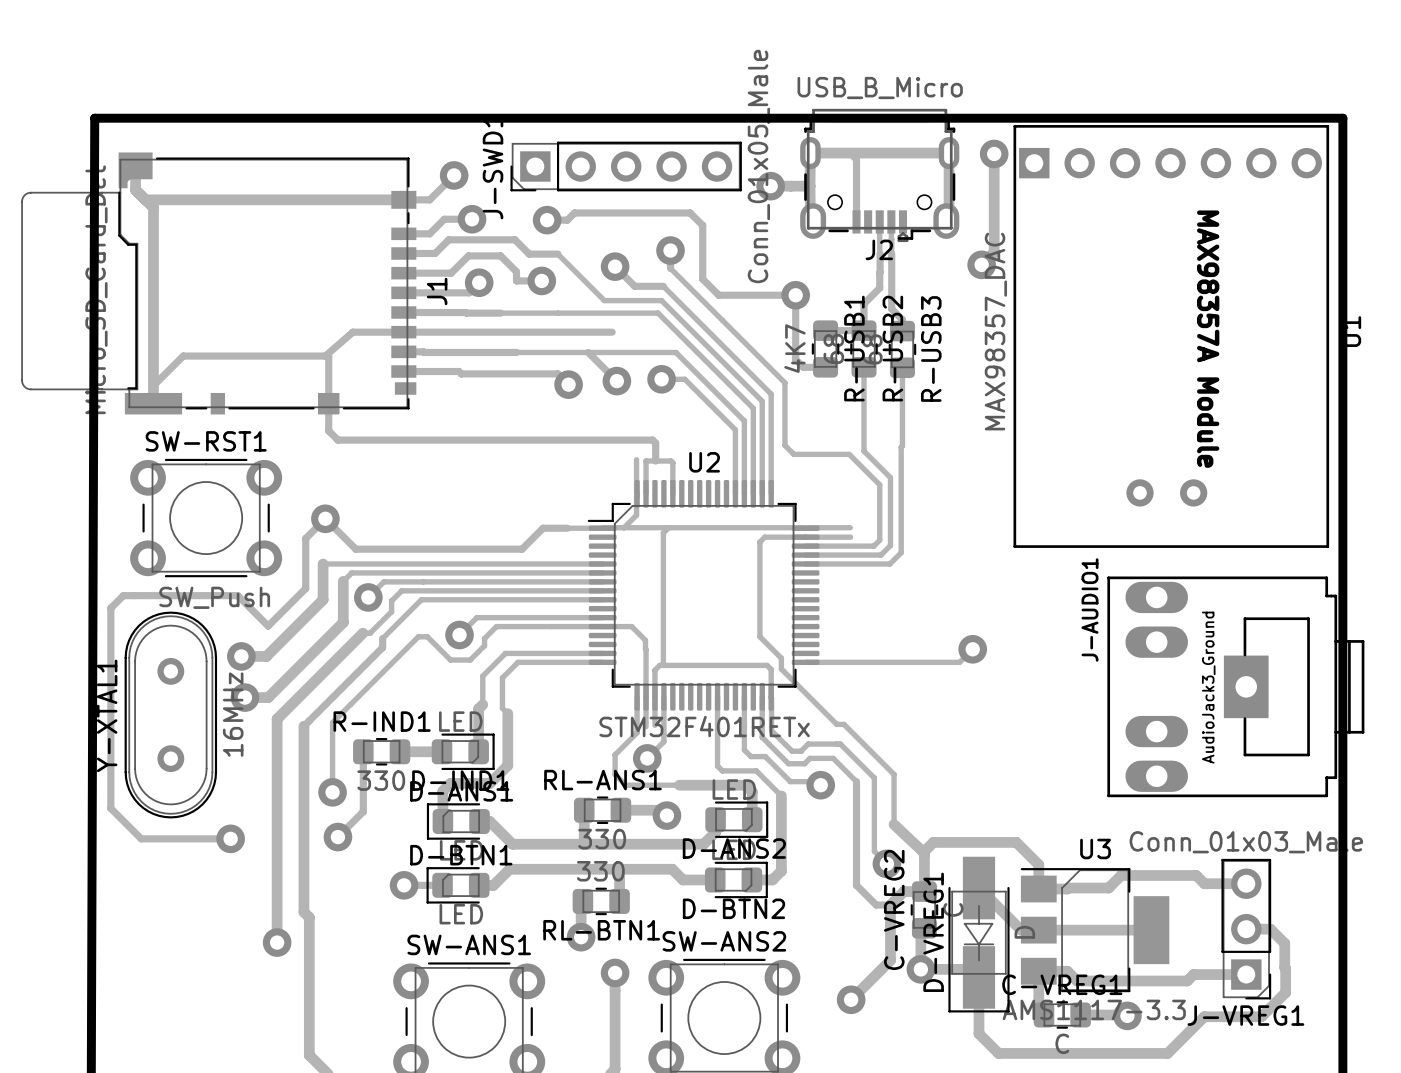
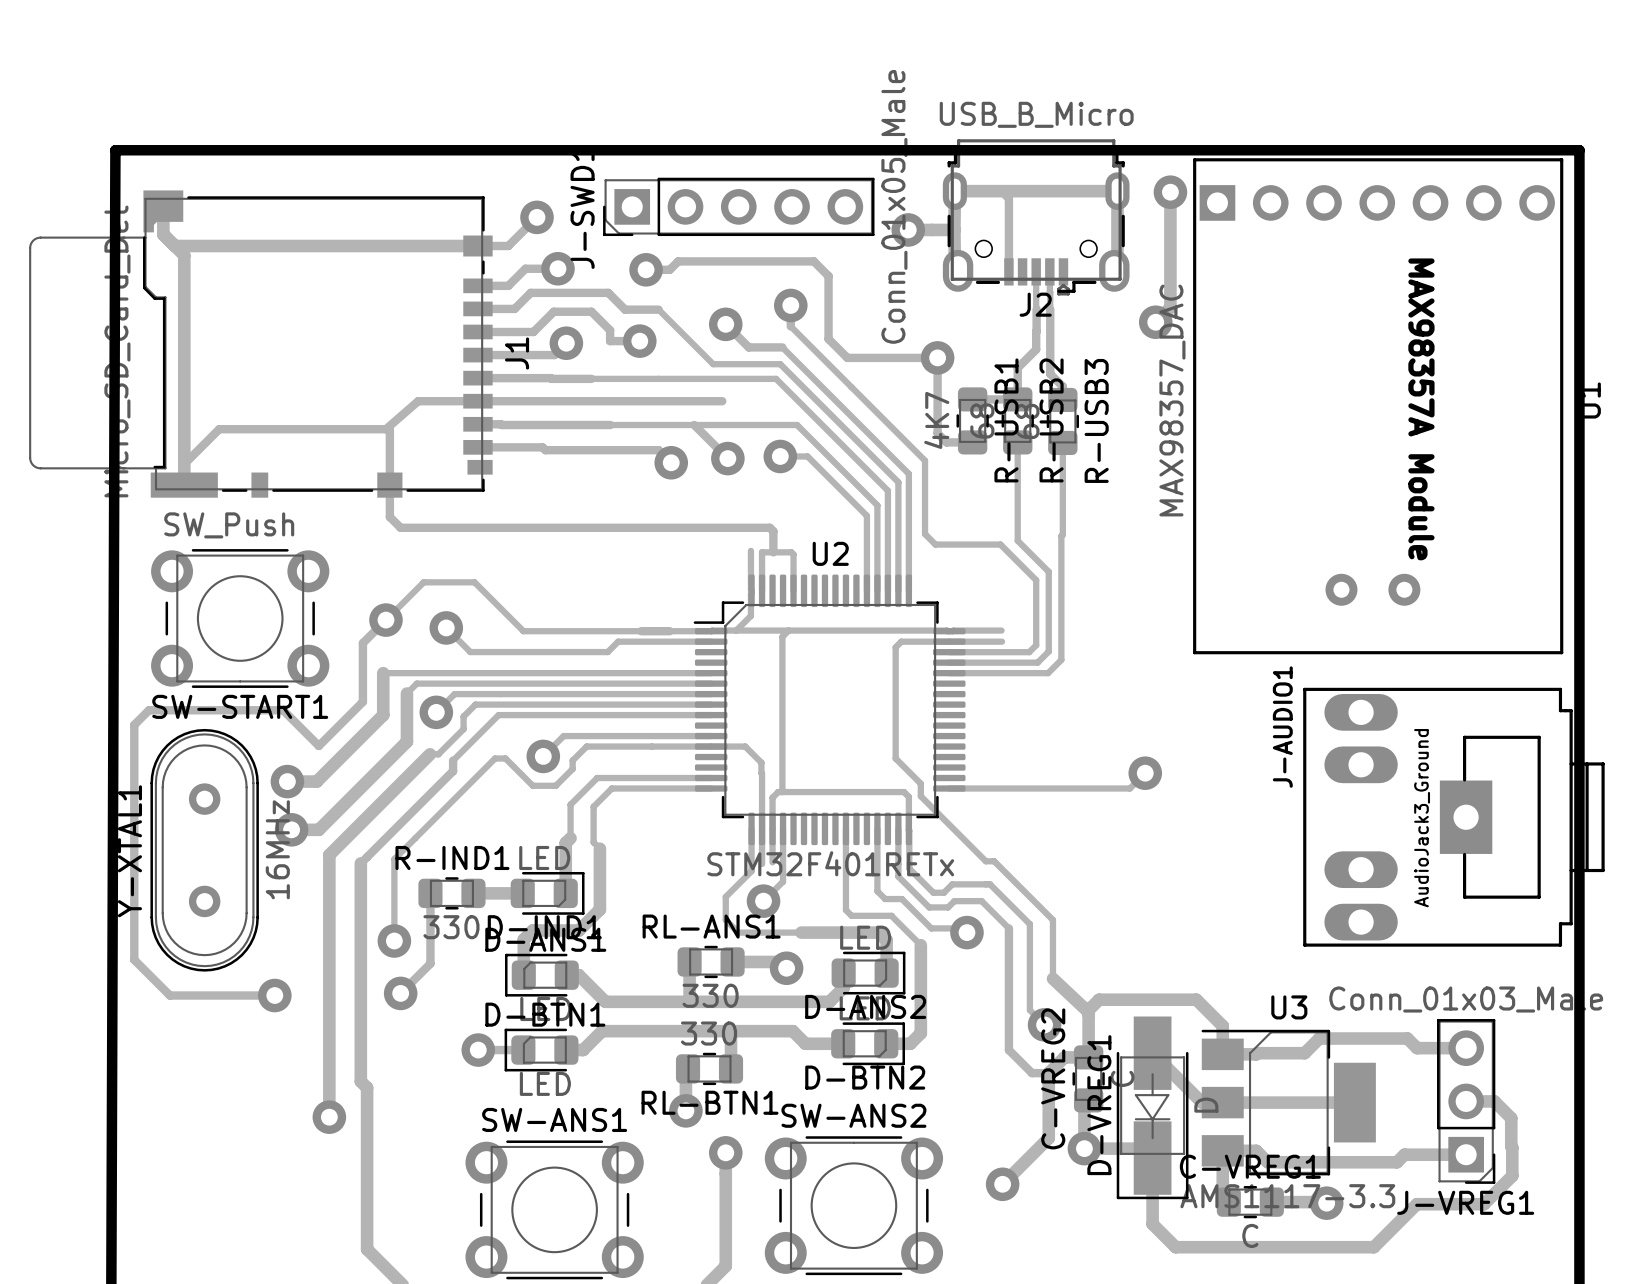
SW-START1: none -> SW_Push (240, 618)
SW-RST1: SW_Push (206, 518) -> none
track: (325, 518) (355, 549) (522, 549) (543, 528) -> (385, 620) (423, 582) (474, 582) (523, 631) (641, 631)
track: none -> (446, 627) (470, 652) (607, 652) (618, 641) (711, 641)
via: none -> (446, 627)

